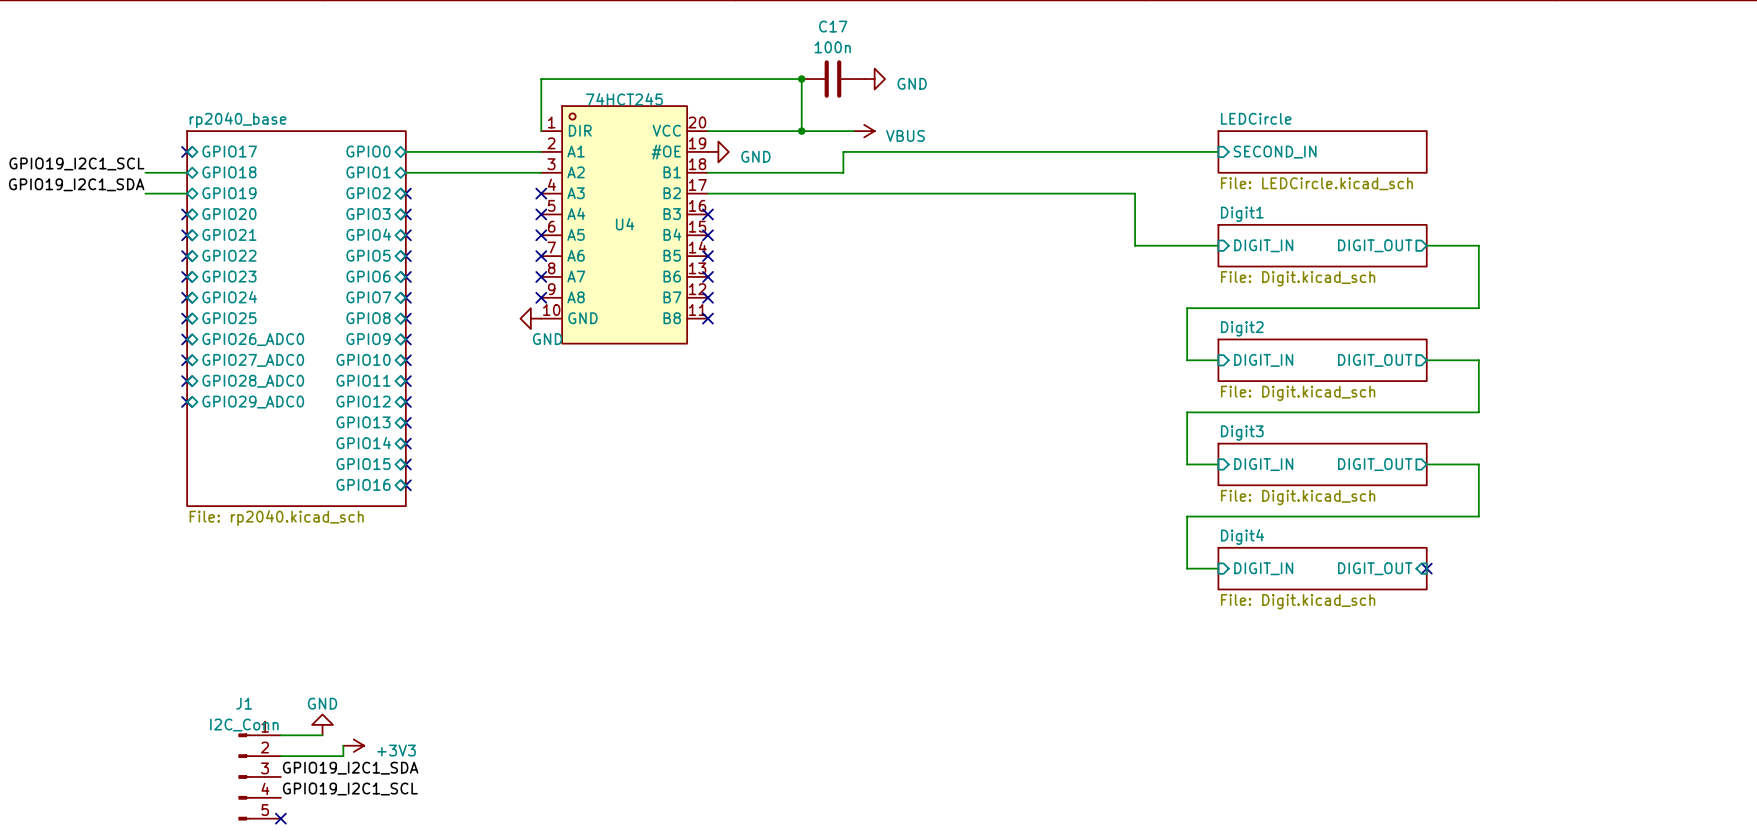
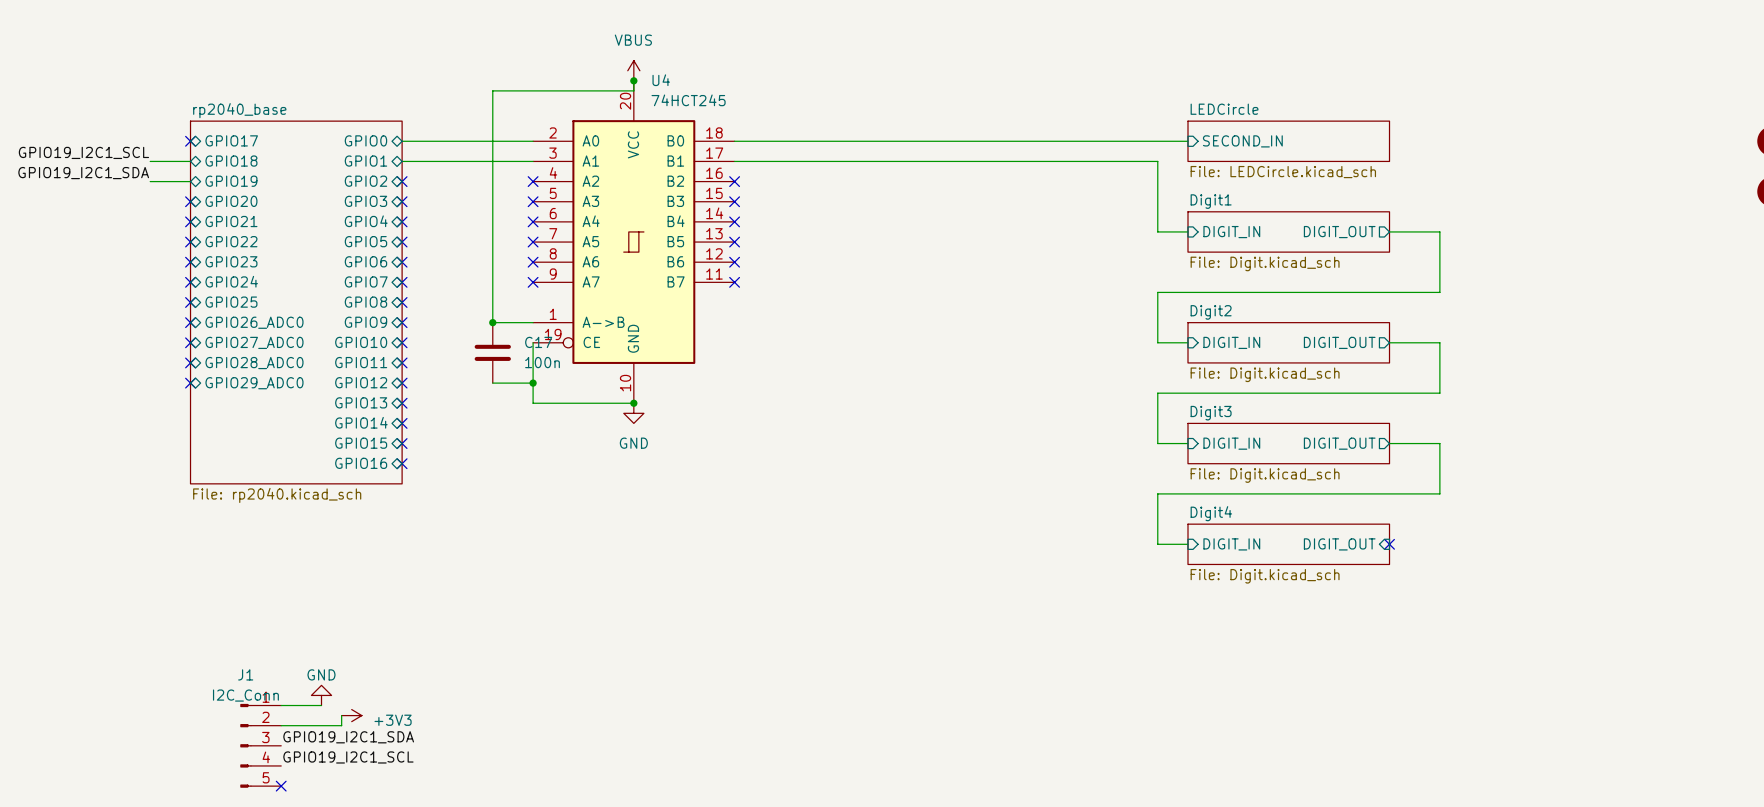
C17 value position: 100n (832, 47) -> 100n (542, 362)
power symbol: none -> VBUS (633, 70)
junction: (801, 79) -> none
C17 rotation: 0° (832, 79) -> 90° clockwise (492, 352)
C17 position: (832, 79) -> (492, 352)
power symbol: GND (874, 79) -> none
wire: none -> (633, 80) (633, 90) (492, 90) (492, 322) (533, 322)
junction: none -> (633, 80)
U4 value position: 74HCT245 (624, 99) -> 74HCT245 (688, 100)
U4 symbol: [541, 106, 708, 344] -> [533, 80, 735, 404]
wire: (541, 131) (541, 79) (801, 79) (801, 131) -> none
wire: (707, 131) (853, 131) -> none
junction: (801, 131) -> none
power symbol: VBUS (864, 131) -> none
power symbol: GND (718, 151) -> none
wire: (843, 151) (843, 172) -> (825, 141) (734, 141)
wire: (707, 193) (1135, 193) (1135, 245) (1187, 245) -> (825, 161) (1157, 161) (1157, 231)
no-connect mark: none -> (734, 181)
no-connect mark: (707, 214) -> none
no-connect mark: none -> (734, 201)
U4 name position: U4 (625, 224) -> U4 (661, 80)
no-connect mark: (707, 235) -> none
no-connect mark: none -> (734, 221)
no-connect mark: (707, 256) -> none
no-connect mark: none -> (734, 242)
no-connect mark: (707, 276) -> none
no-connect mark: none -> (734, 262)
no-connect mark: (707, 297) -> none
no-connect mark: none -> (734, 282)
power symbol: GND (530, 318) -> none
no-connect mark: (707, 318) -> none
junction: none -> (492, 322)
wire: none -> (533, 342) (533, 403) (633, 403)
wire: none -> (492, 383) (533, 383)
junction: none -> (533, 383)
junction: none -> (633, 403)
power symbol: none -> GND (633, 413)

